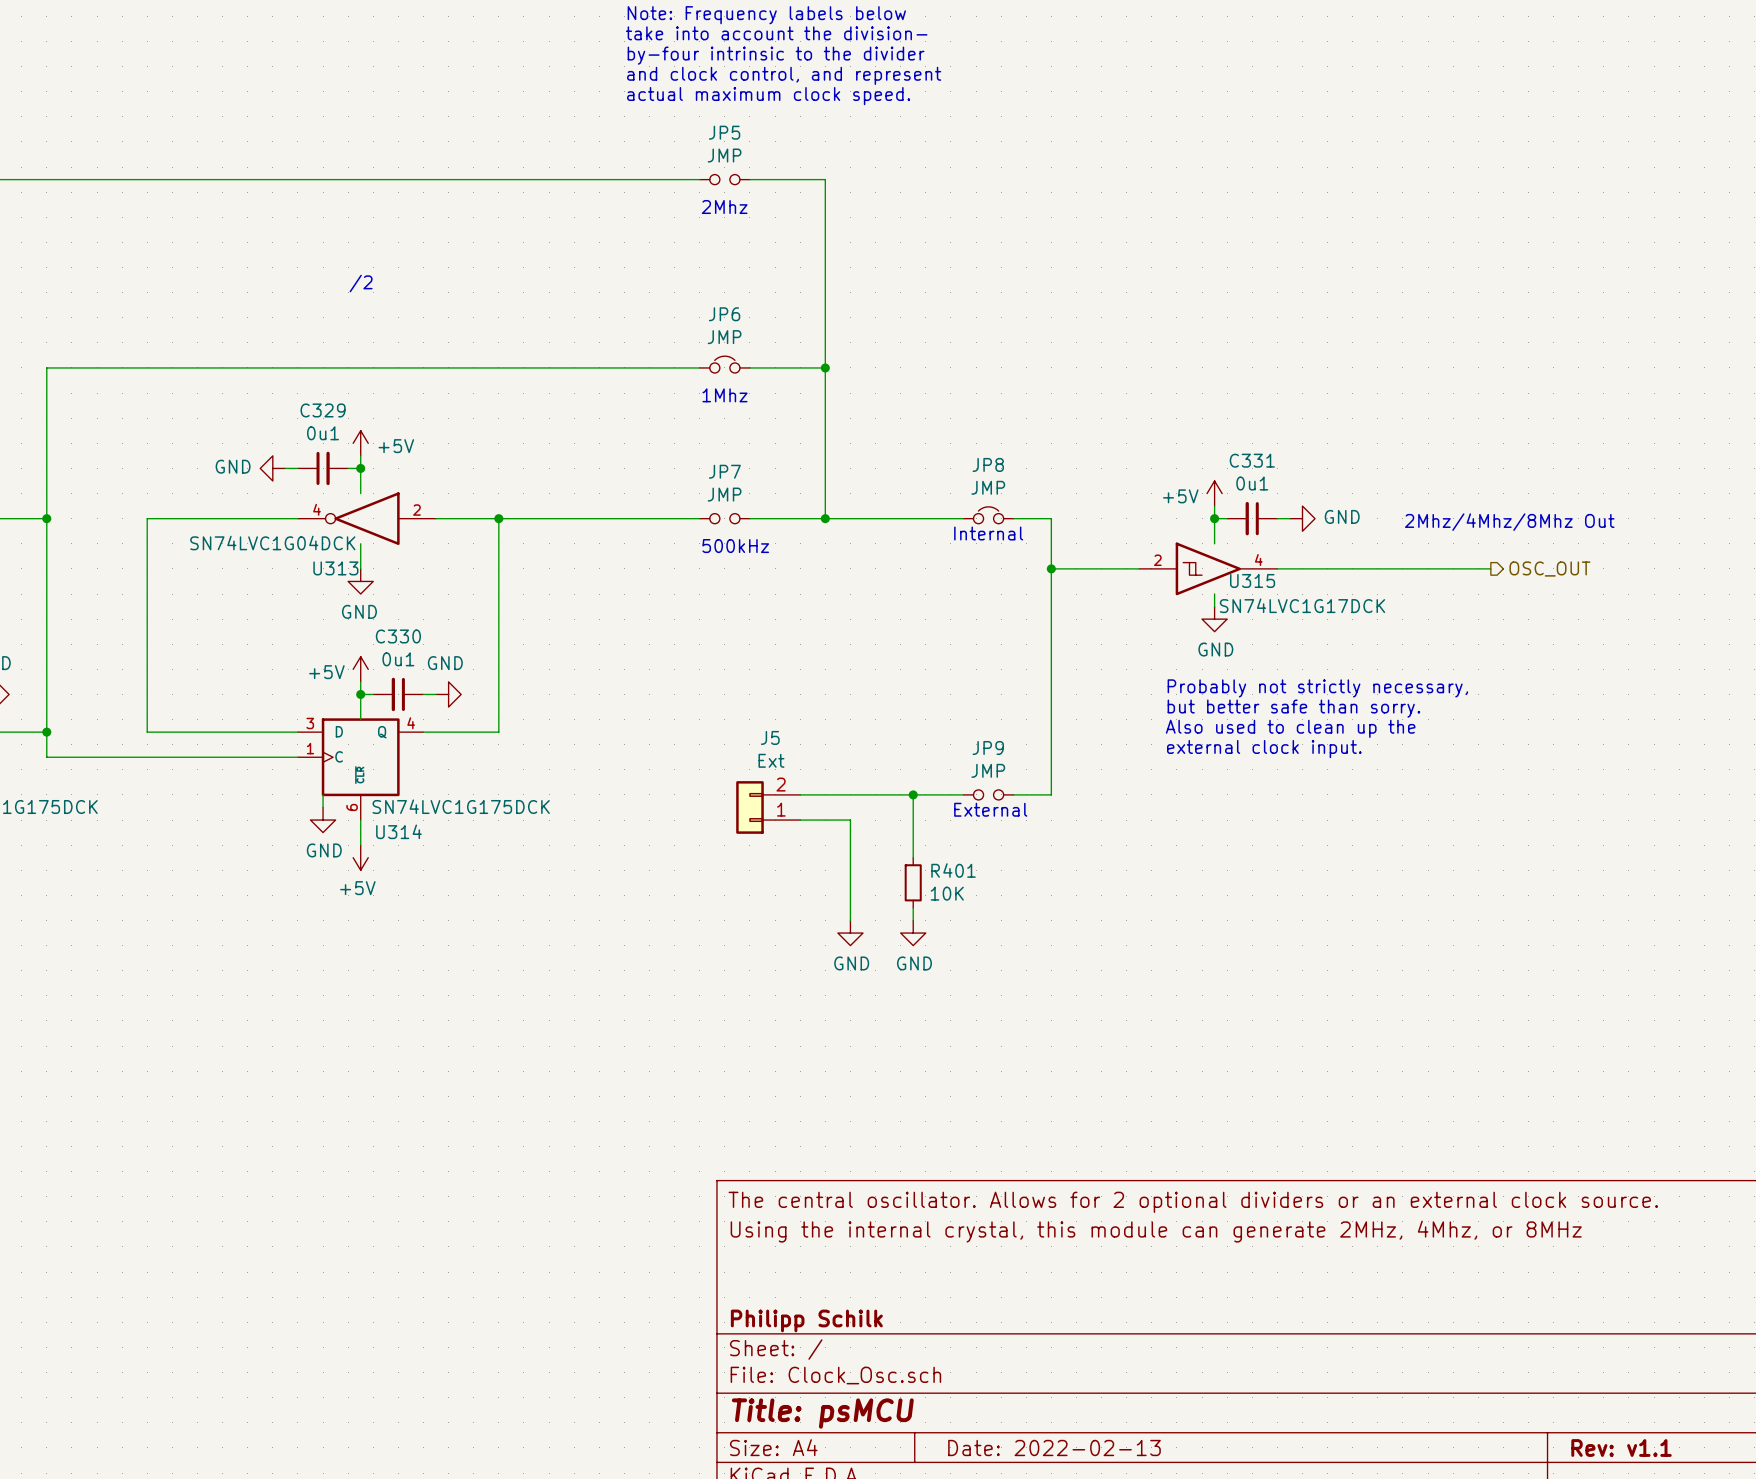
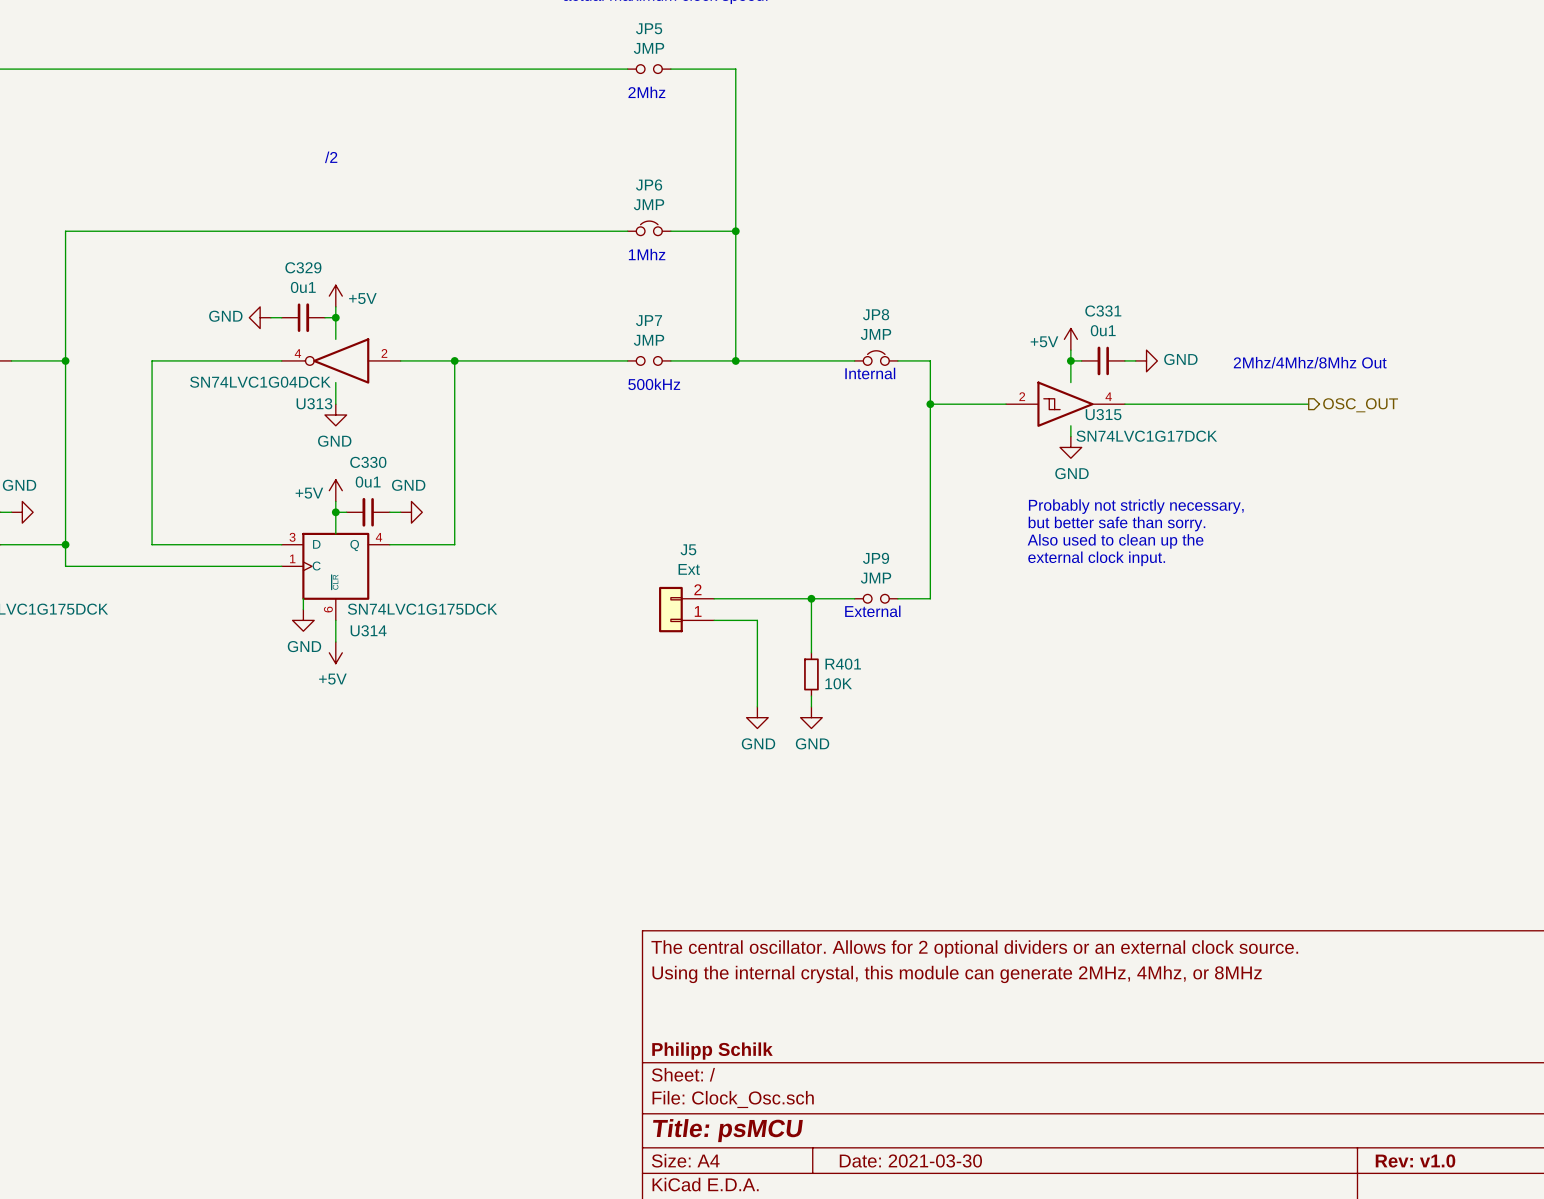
title block: Date: 2022-02-13 (1054, 1448) -> Date: 2021-03-30 (910, 1160)
title block: Rev: v1.1 (1621, 1448) -> Rev: v1.0 (1415, 1160)

